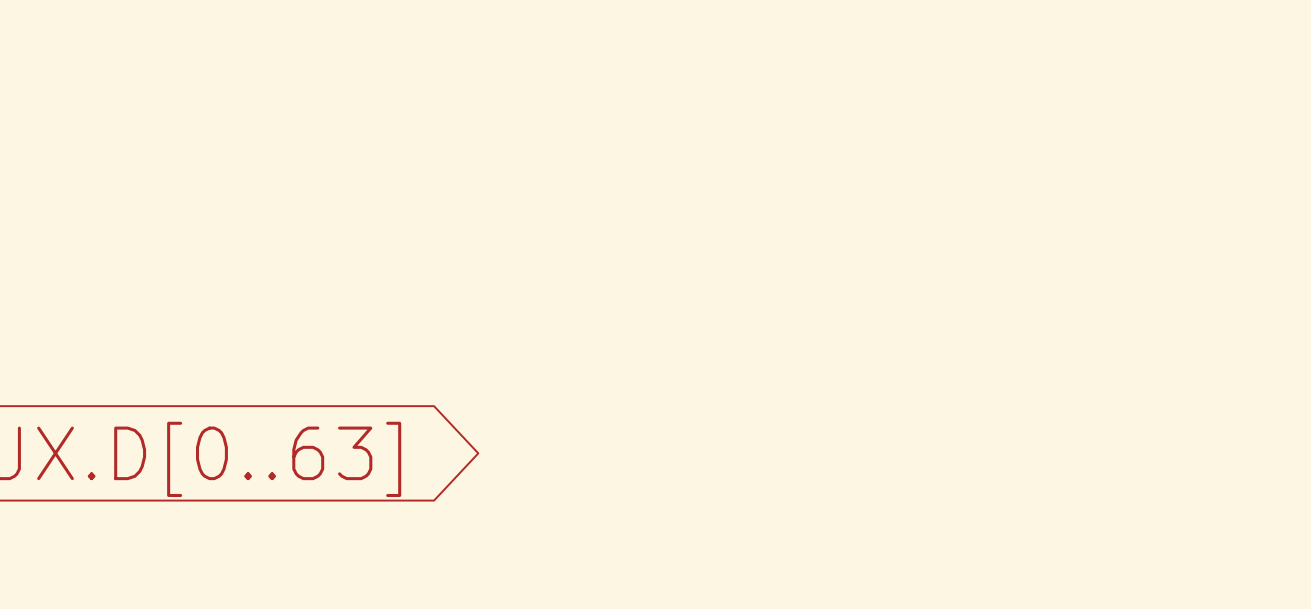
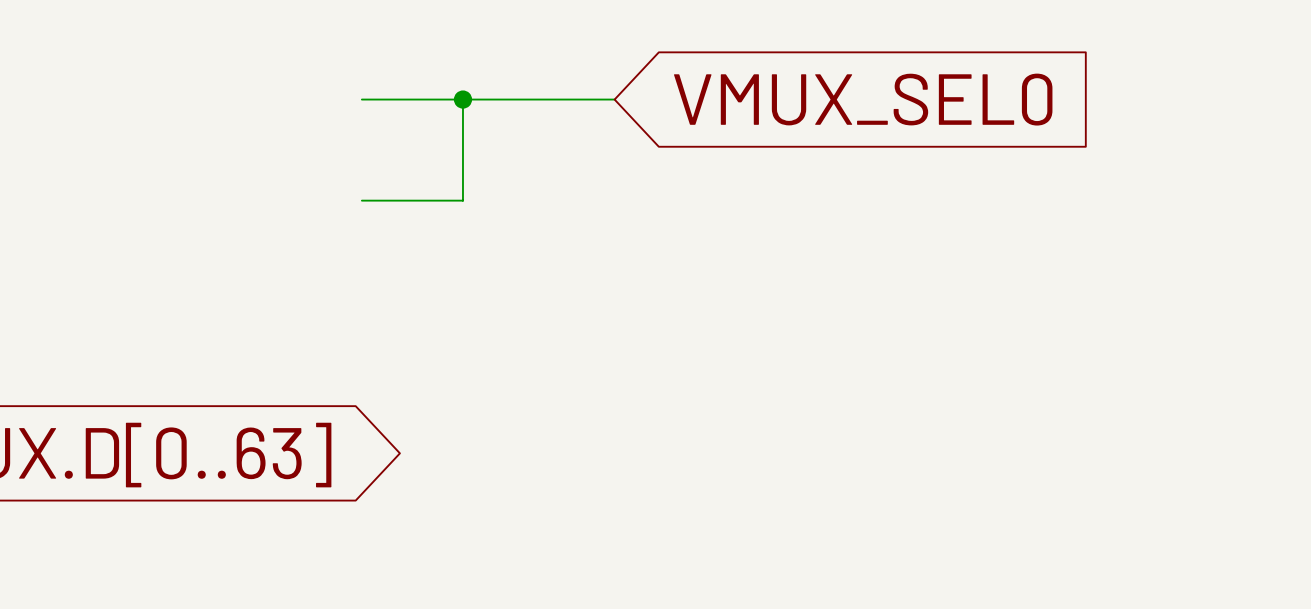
wire: none -> (361, 99) (614, 99)
wire: none -> (462, 99) (462, 200) (361, 200)
junction: none -> (462, 99)
global label: none -> VMUX_SEL0 (863, 99)

